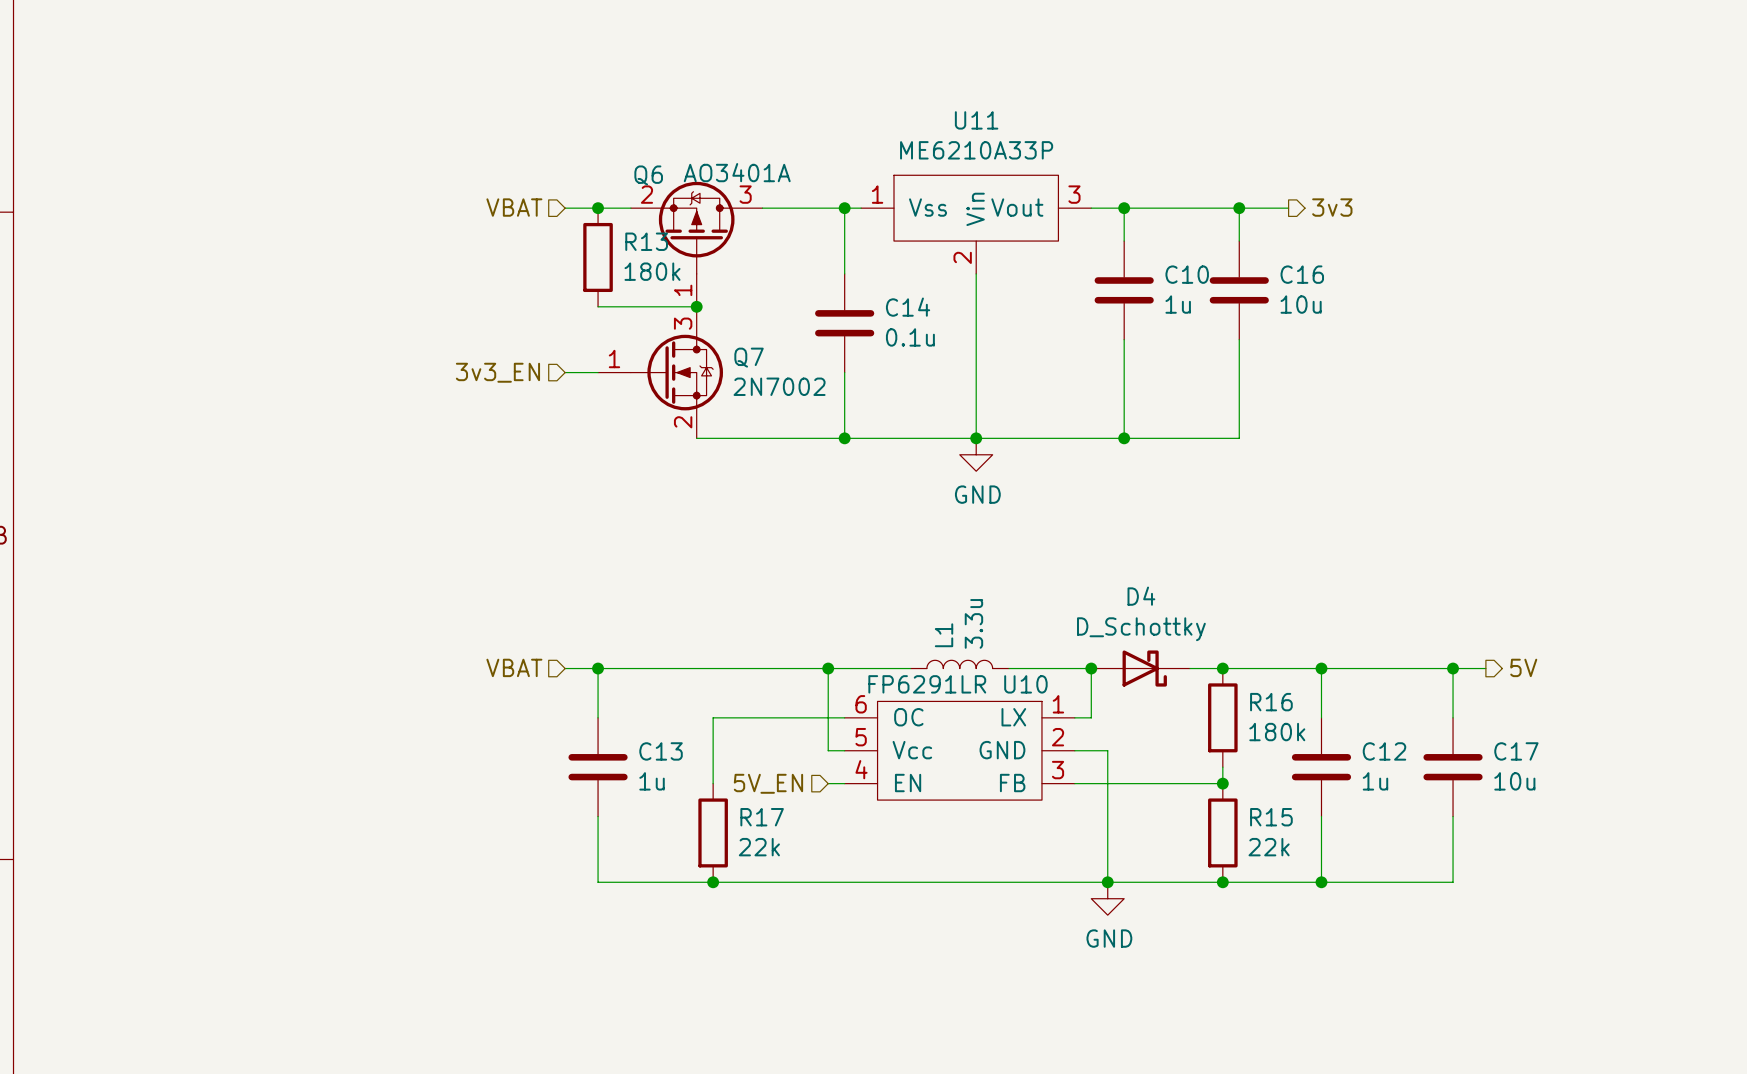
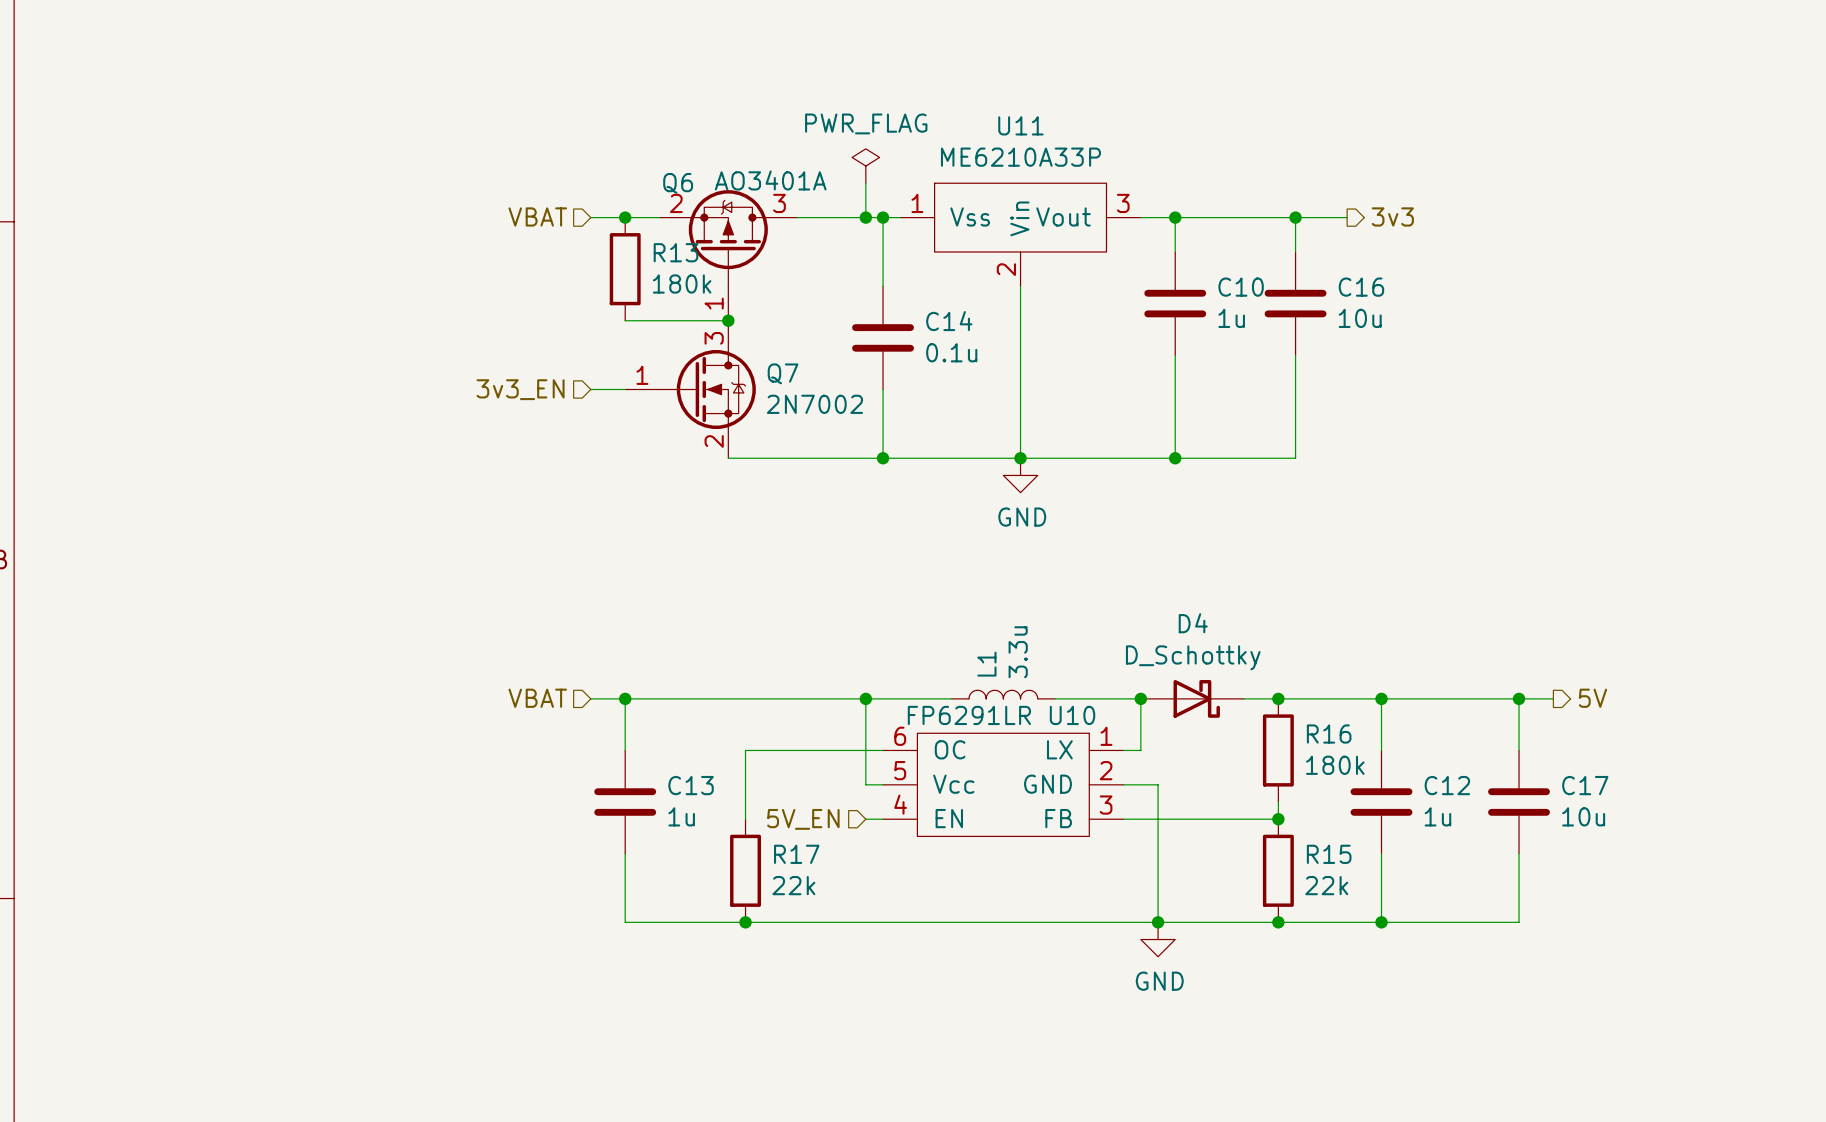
power symbol: none -> PWR_FLAG (865, 166)
wire: none -> (865, 183) (865, 217)
junction: none -> (865, 217)

